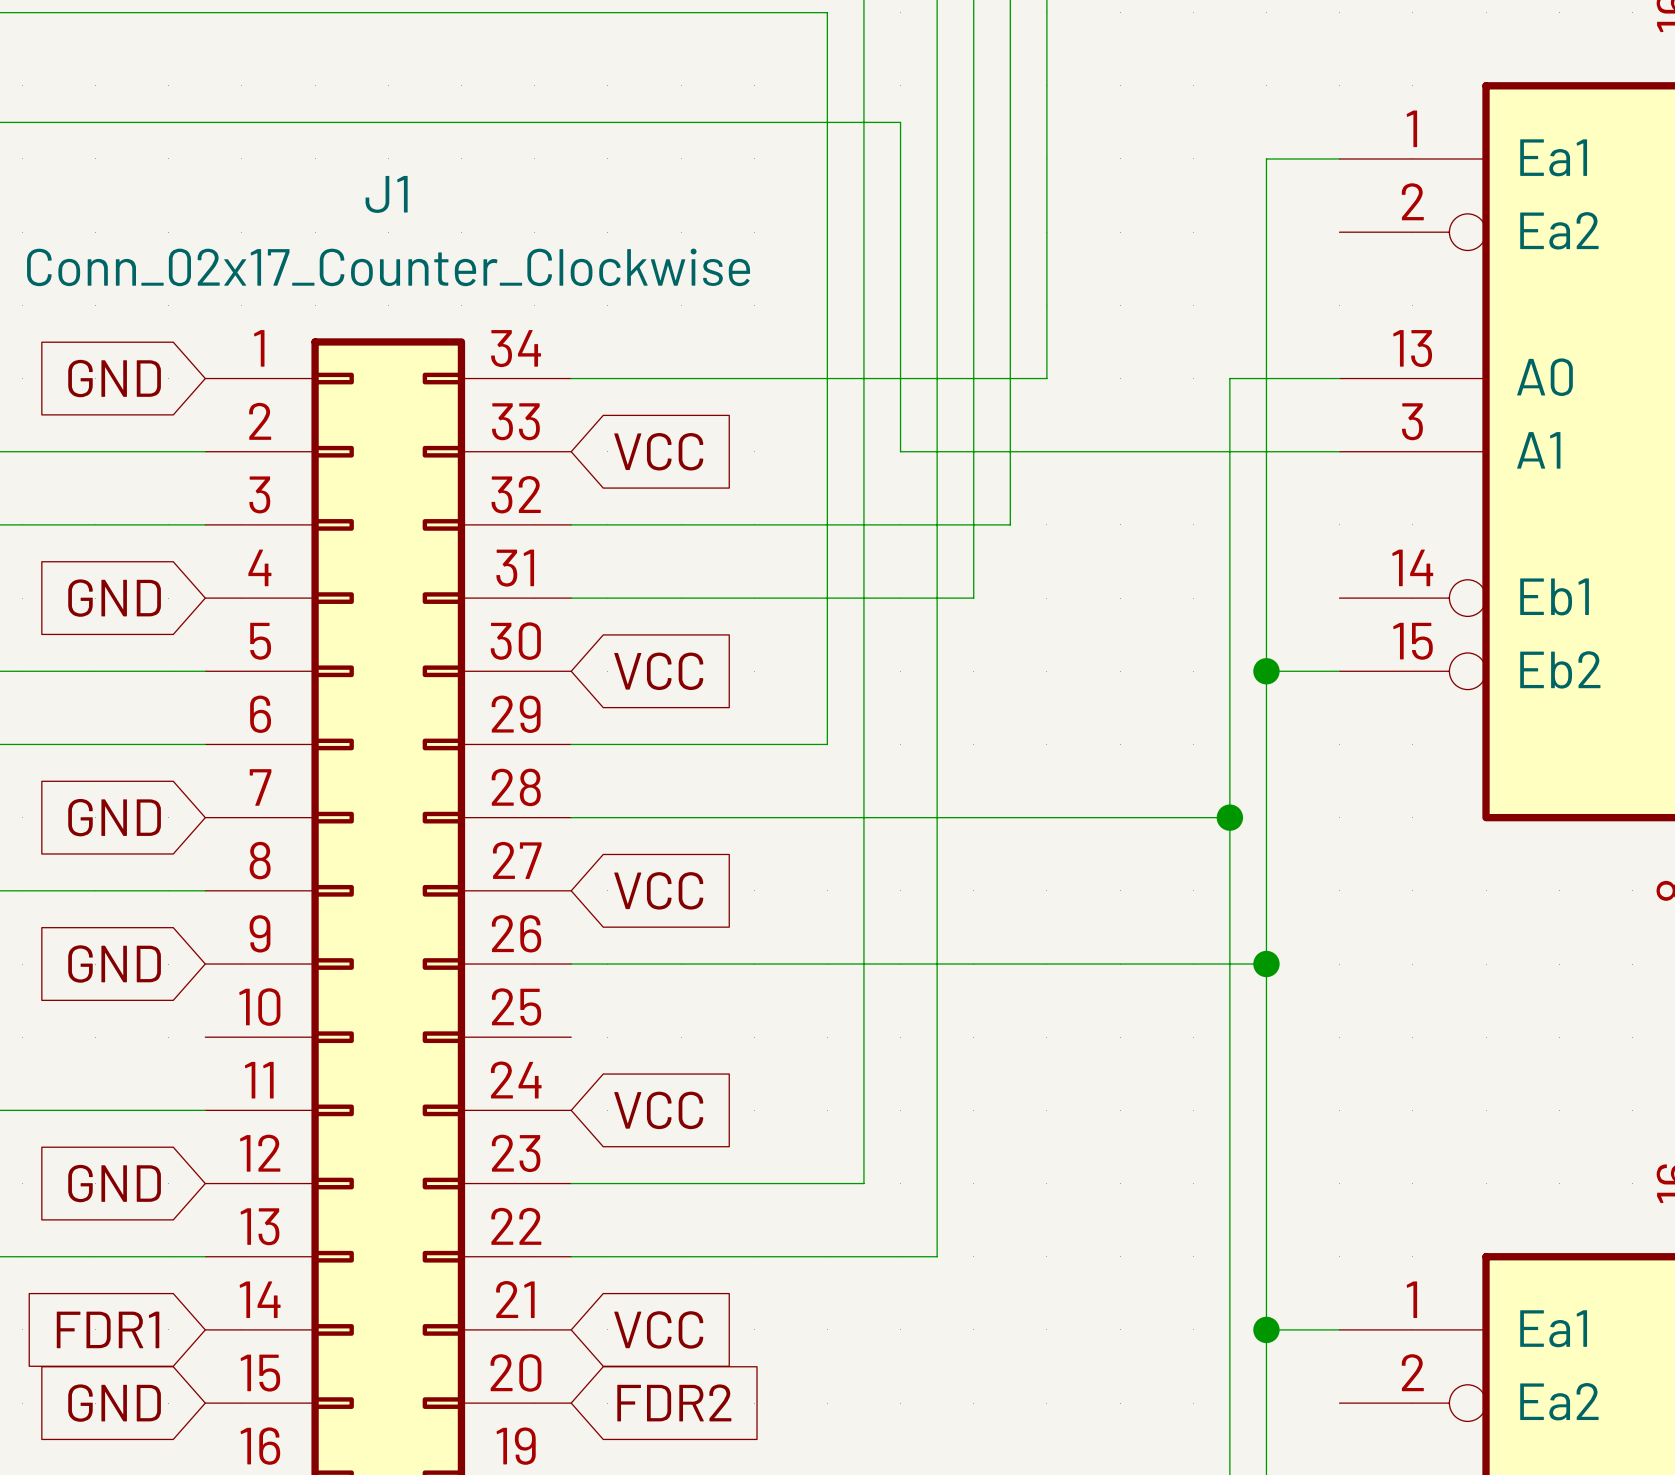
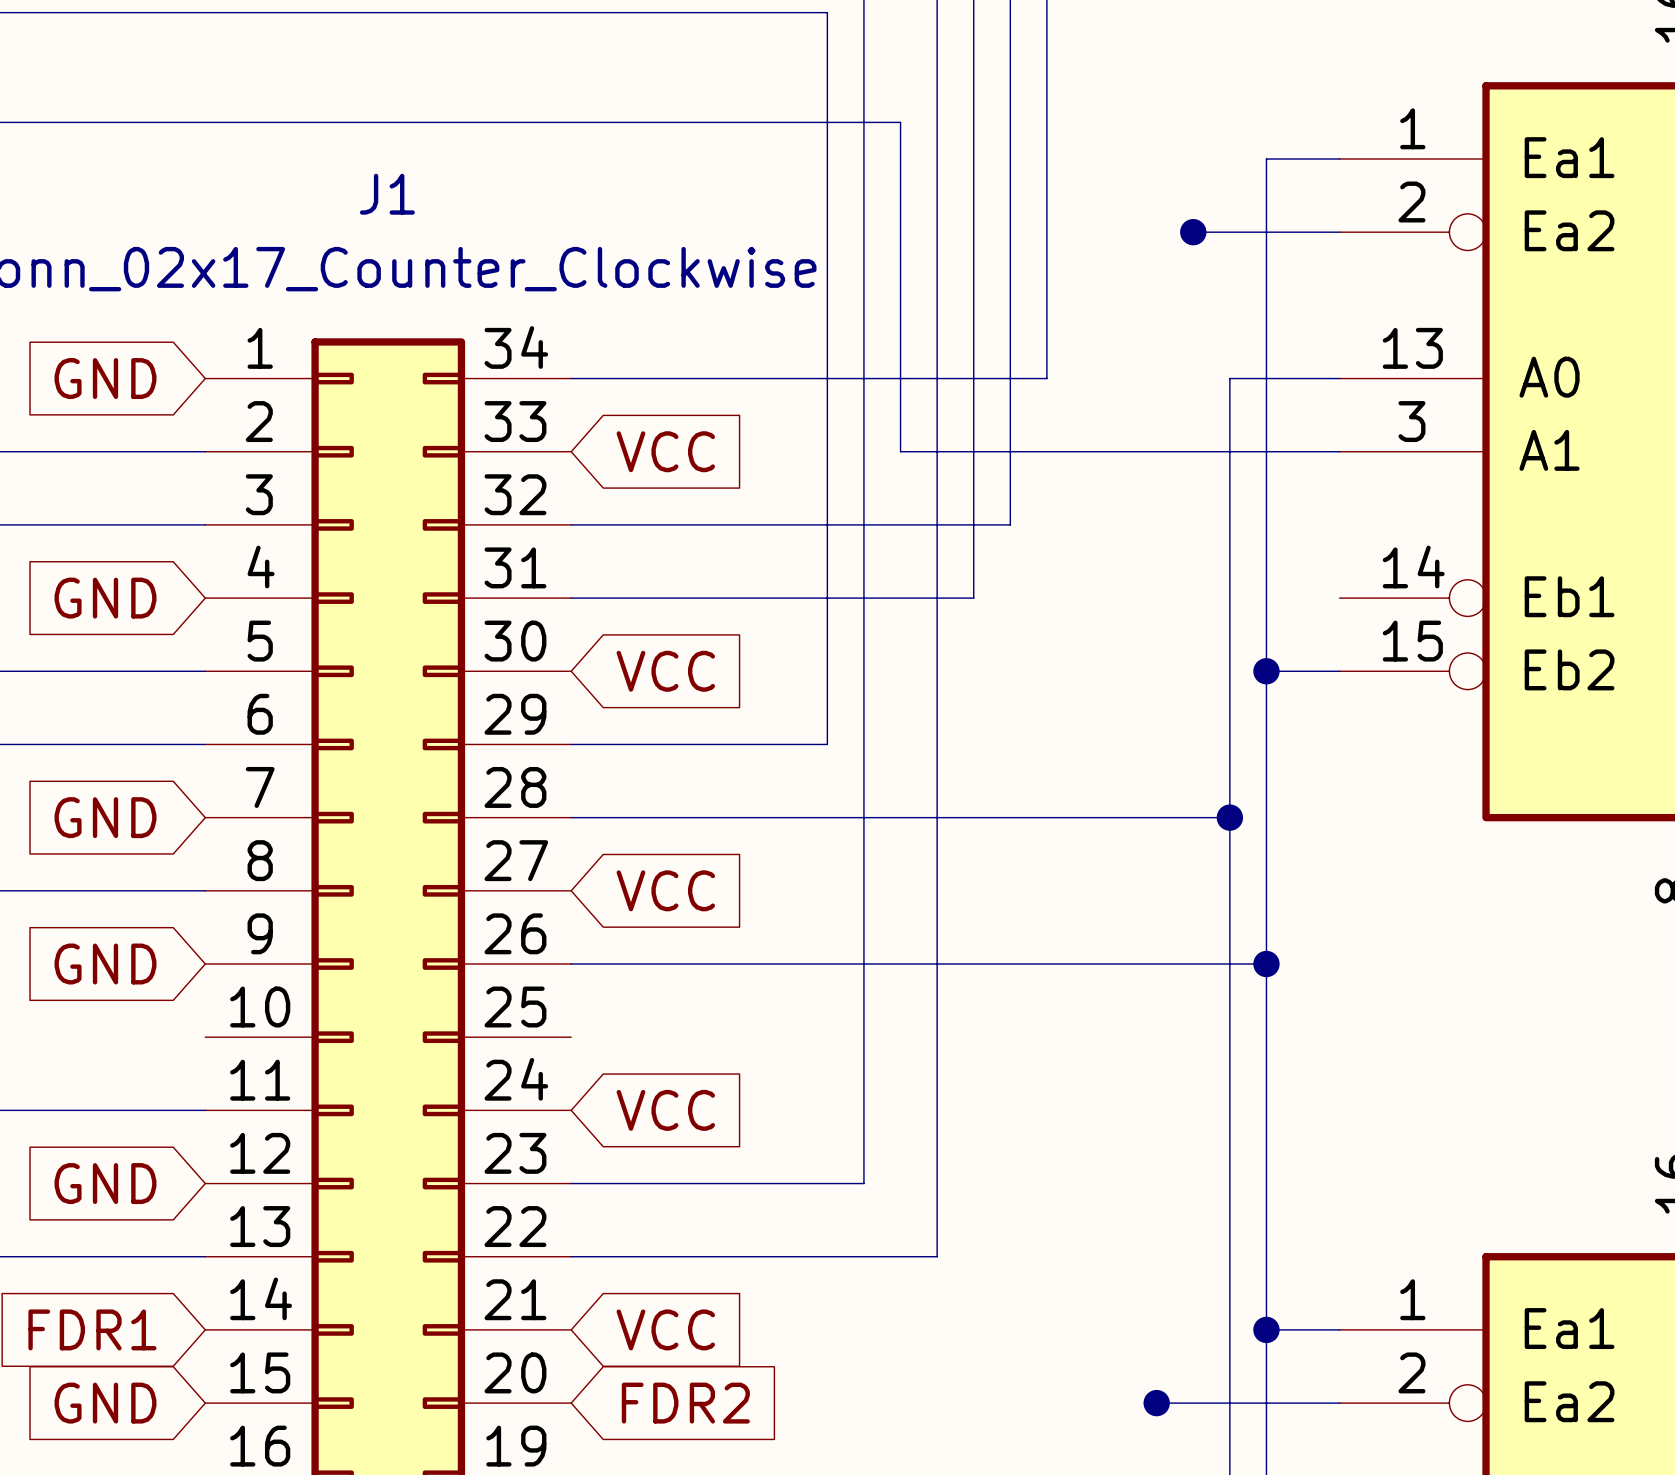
wire: none -> (1193, 232) (1339, 232)
junction: none -> (1193, 232)
wire: none -> (1156, 1403) (1339, 1403)
junction: none -> (1156, 1403)

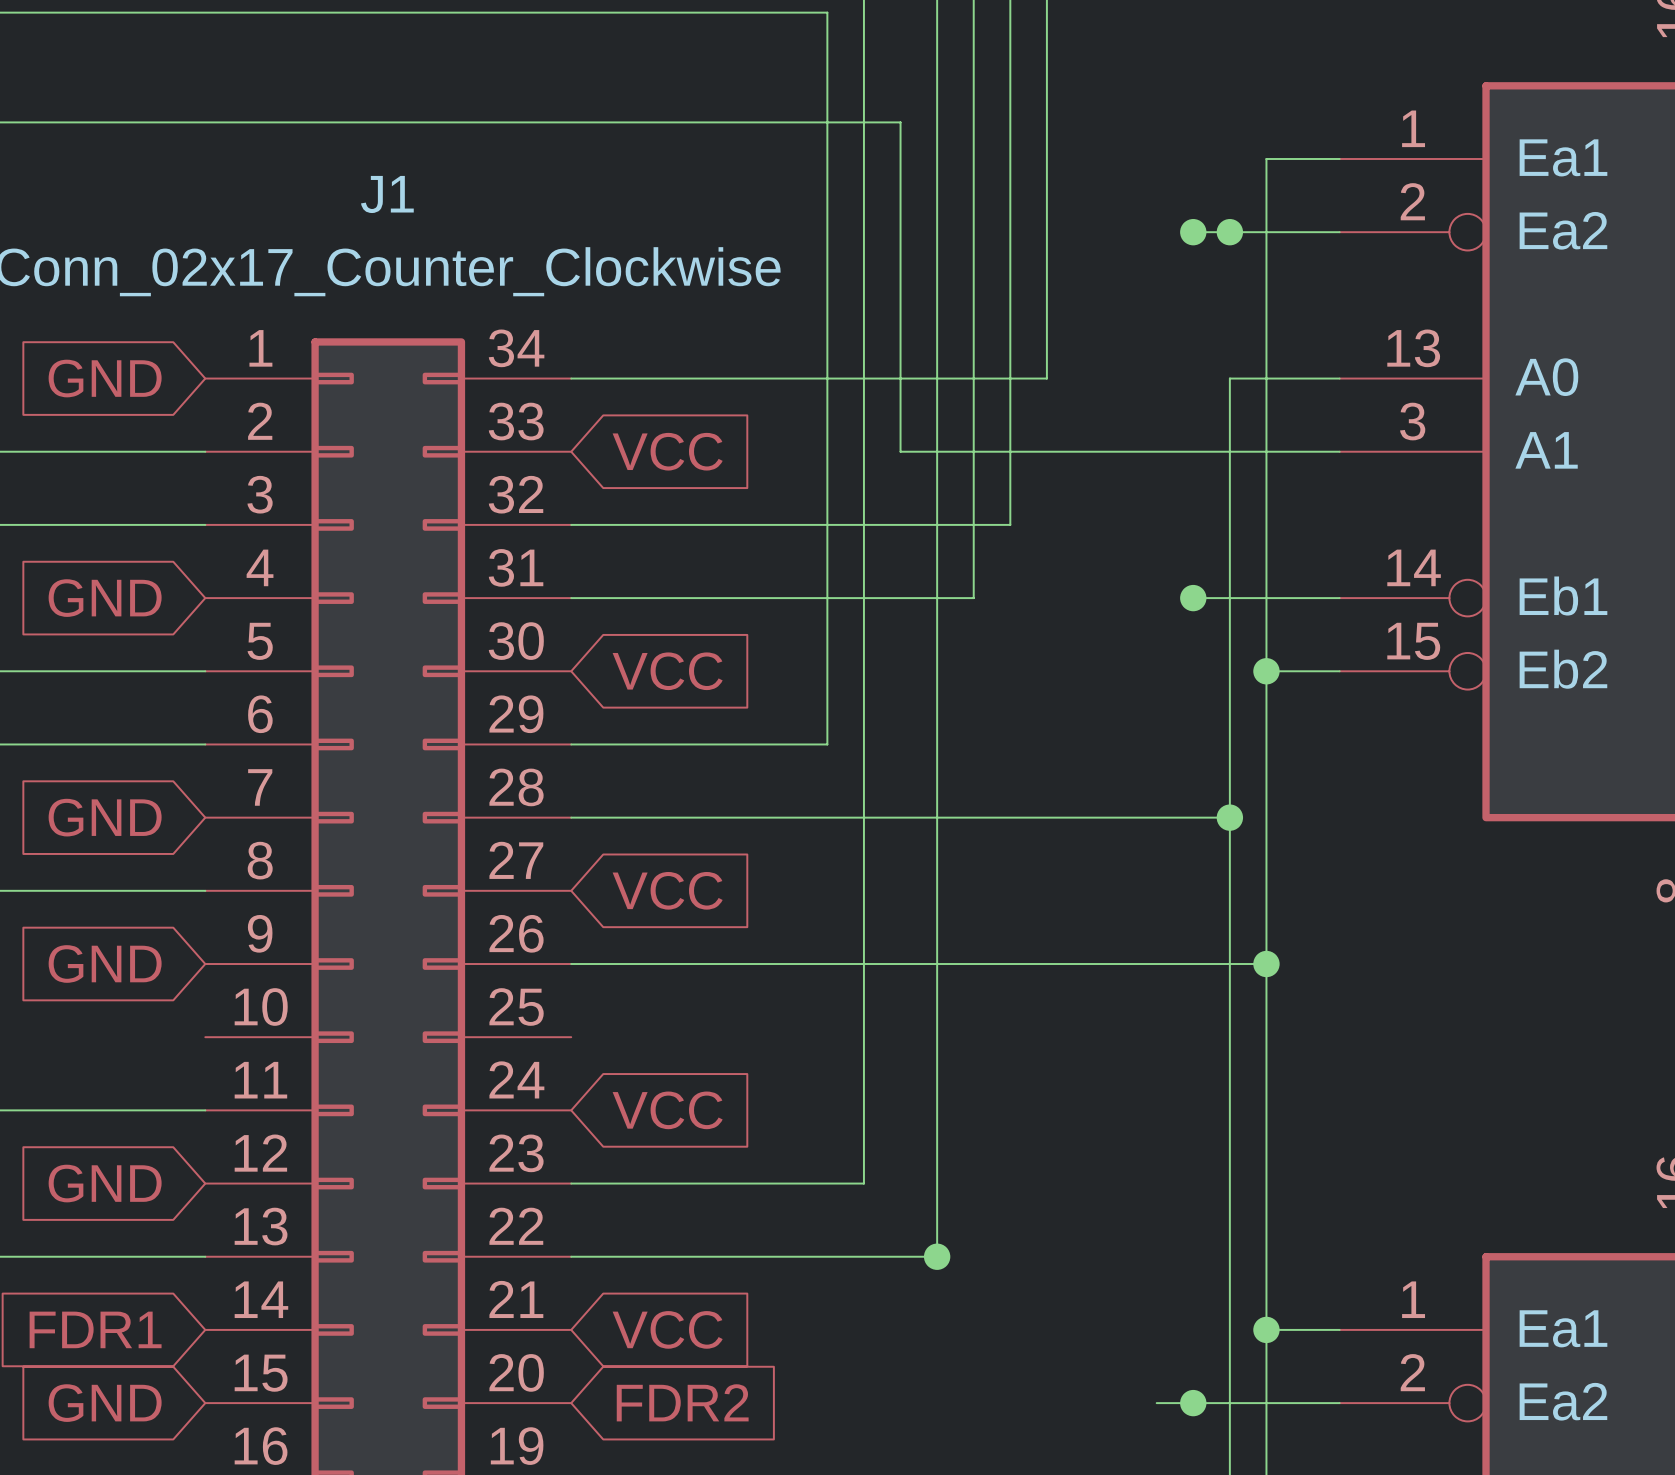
junction: none -> (1229, 232)
wire: none -> (1193, 598) (1339, 598)
junction: none -> (1193, 598)
junction: none -> (937, 1256)
junction position: (1156, 1403) -> (1193, 1403)

